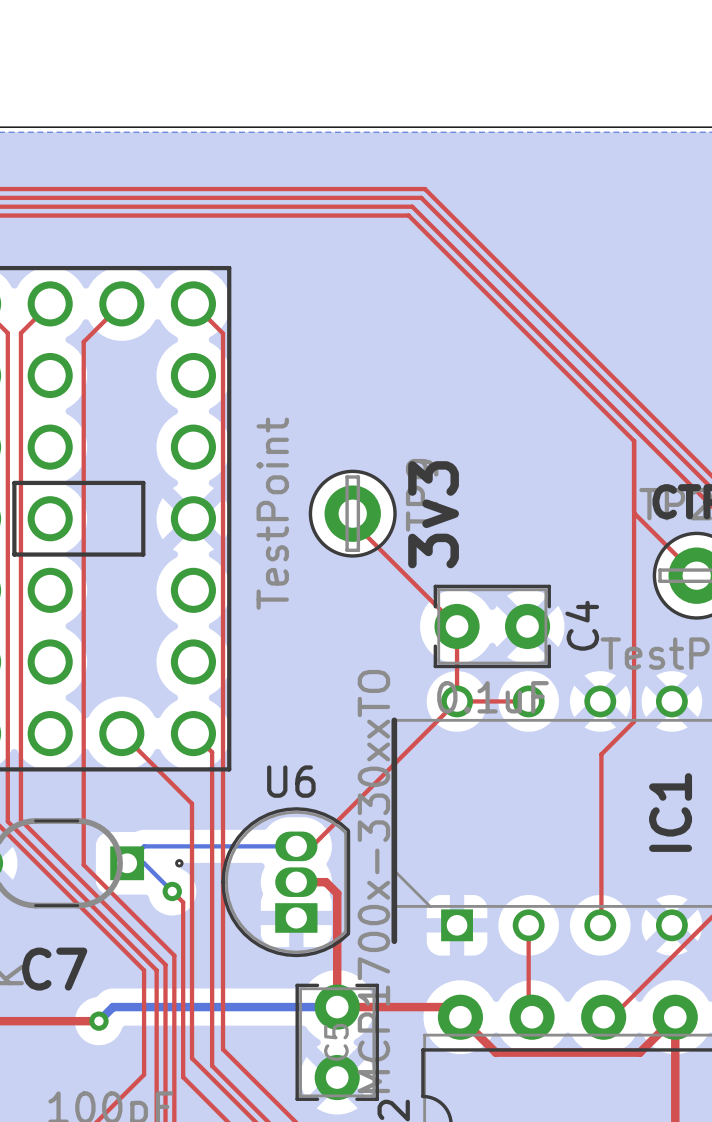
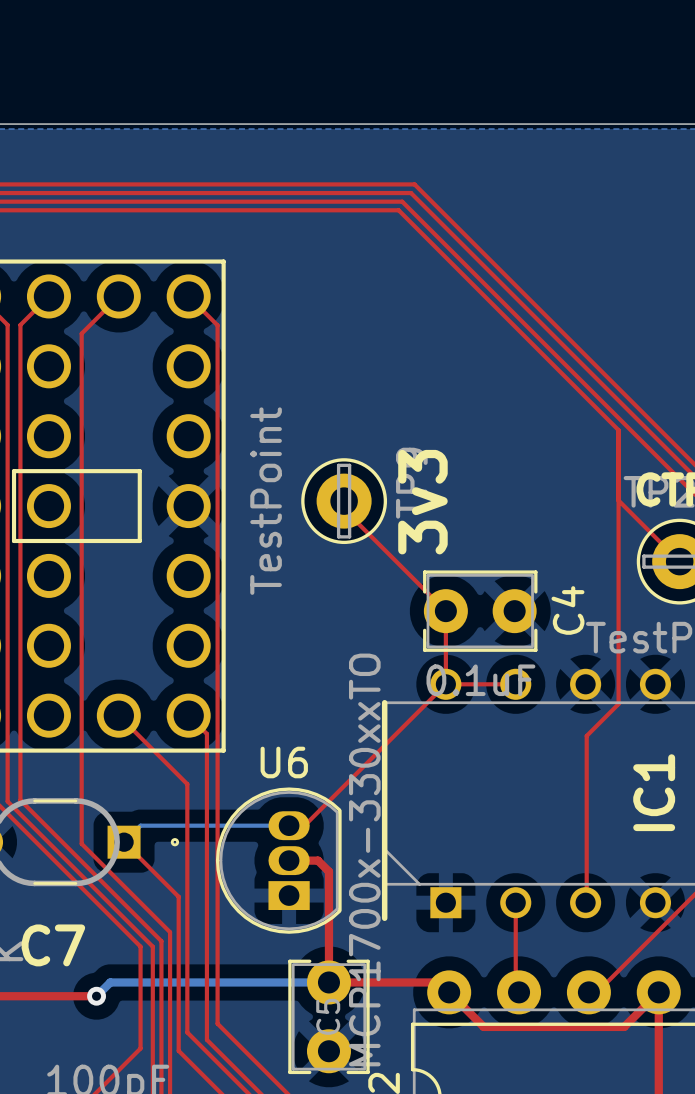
bottom track: (127, 863) (144, 863) (172, 891) -> none
top track: (172, 891) (183, 902) (183, 919) -> (124, 842) (178, 896)
via: (172, 891) -> none

